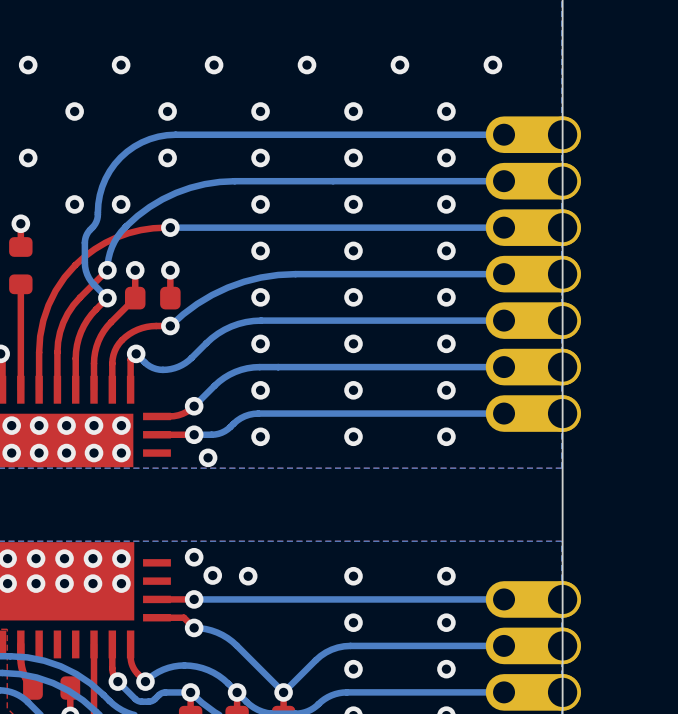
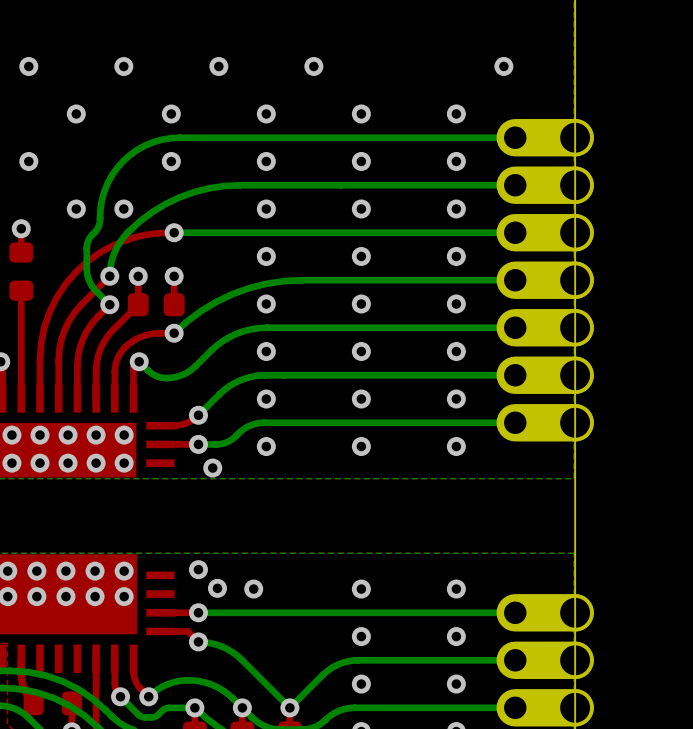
via: (399, 65) -> none

